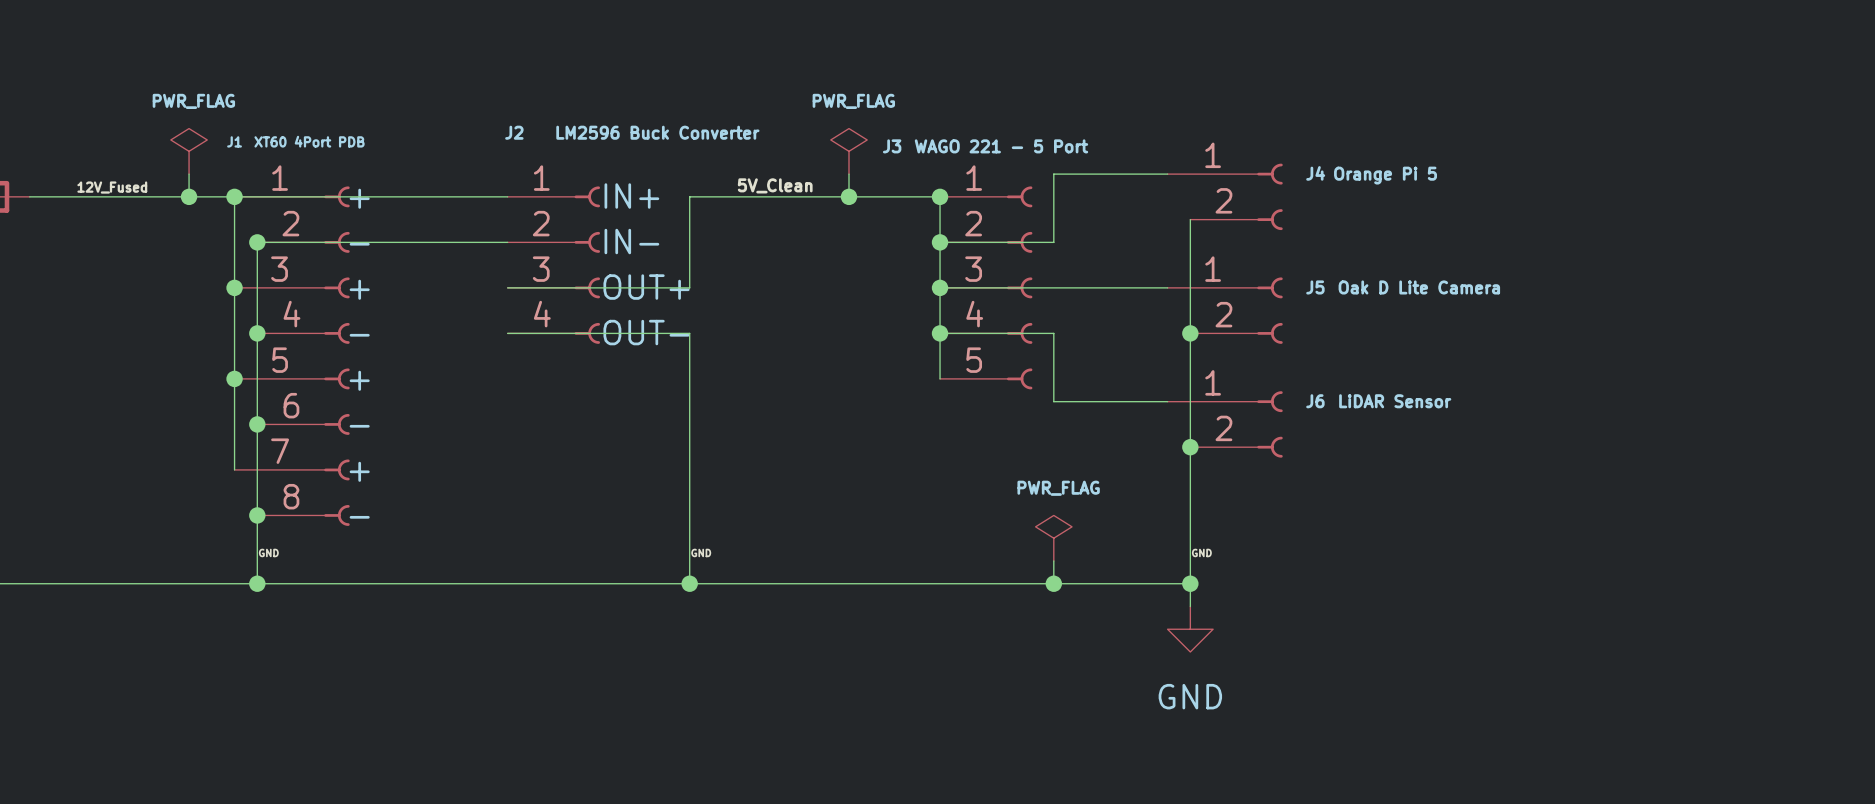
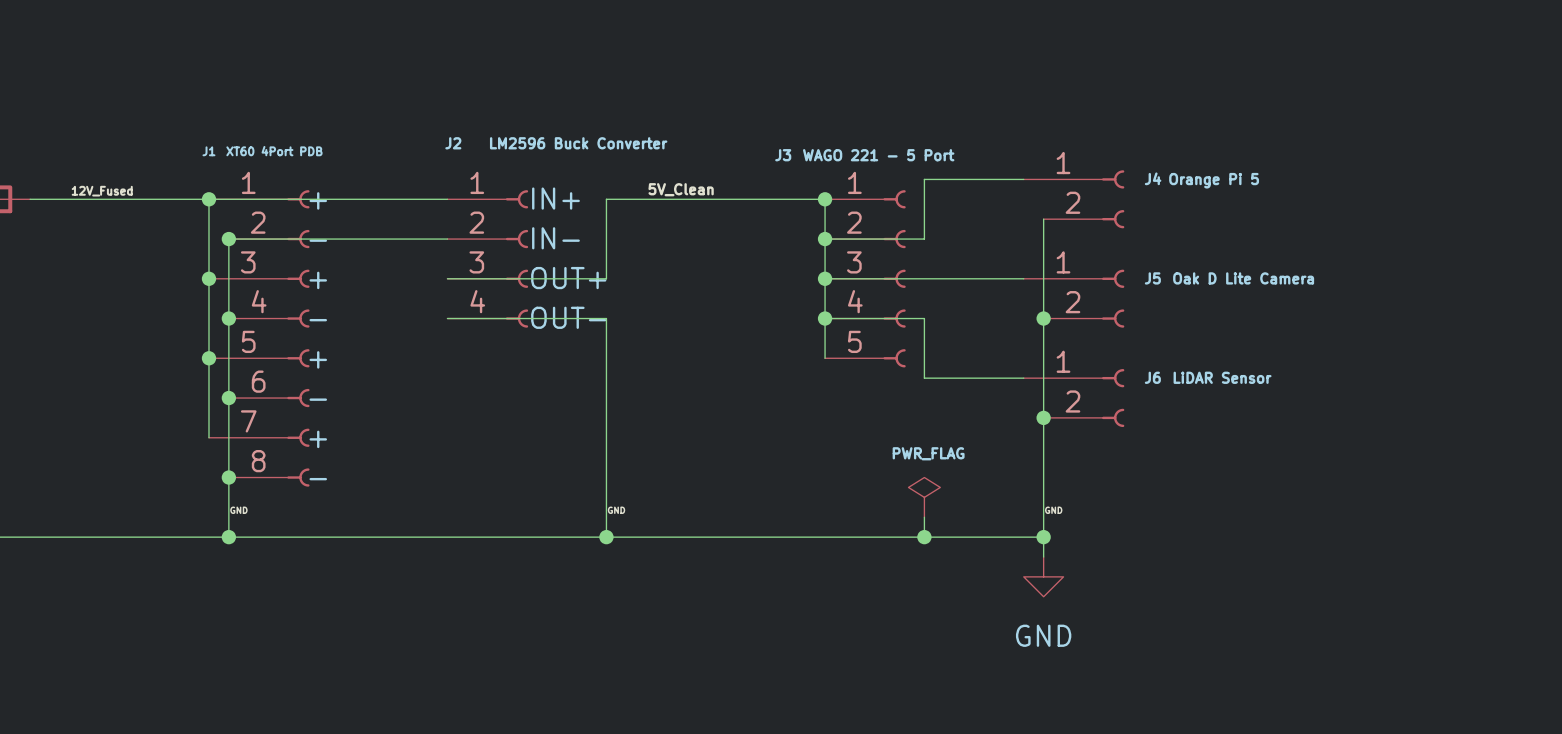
power symbol: PWR_FLAG (189, 151) -> none
power symbol: PWR_FLAG (848, 151) -> none
wire: (189, 174) (189, 196) -> none
wire: (848, 174) (848, 196) -> none
junction: (189, 196) -> none
junction: (848, 196) -> none

